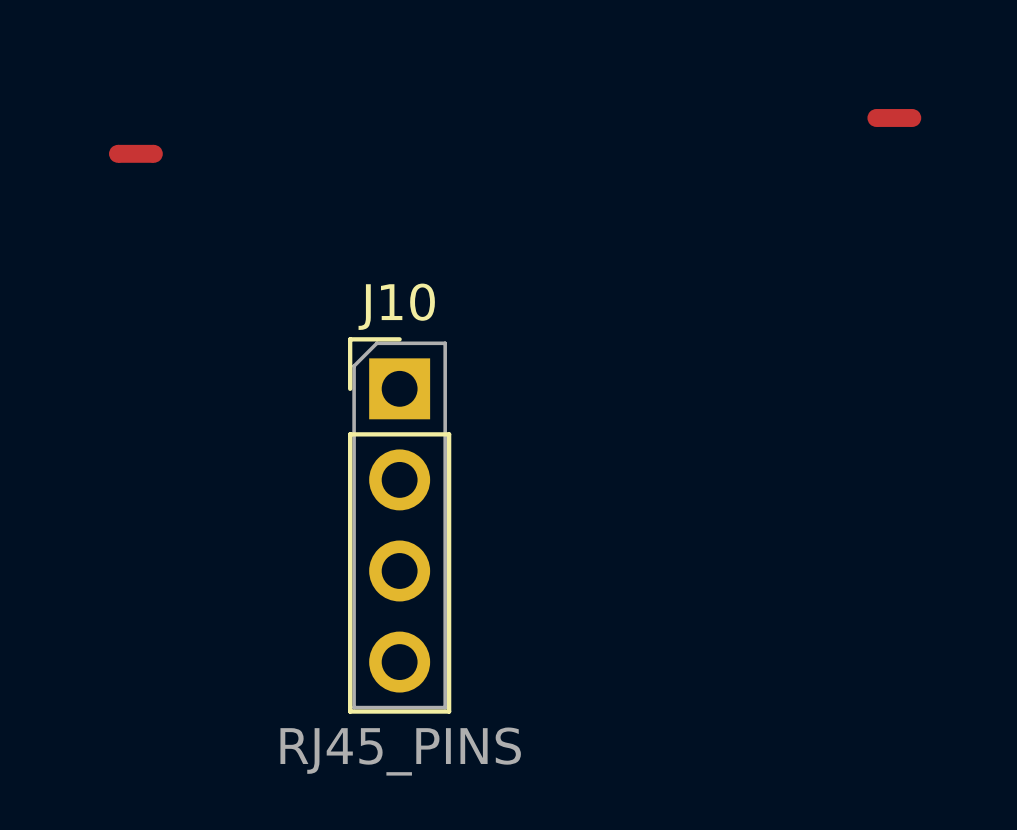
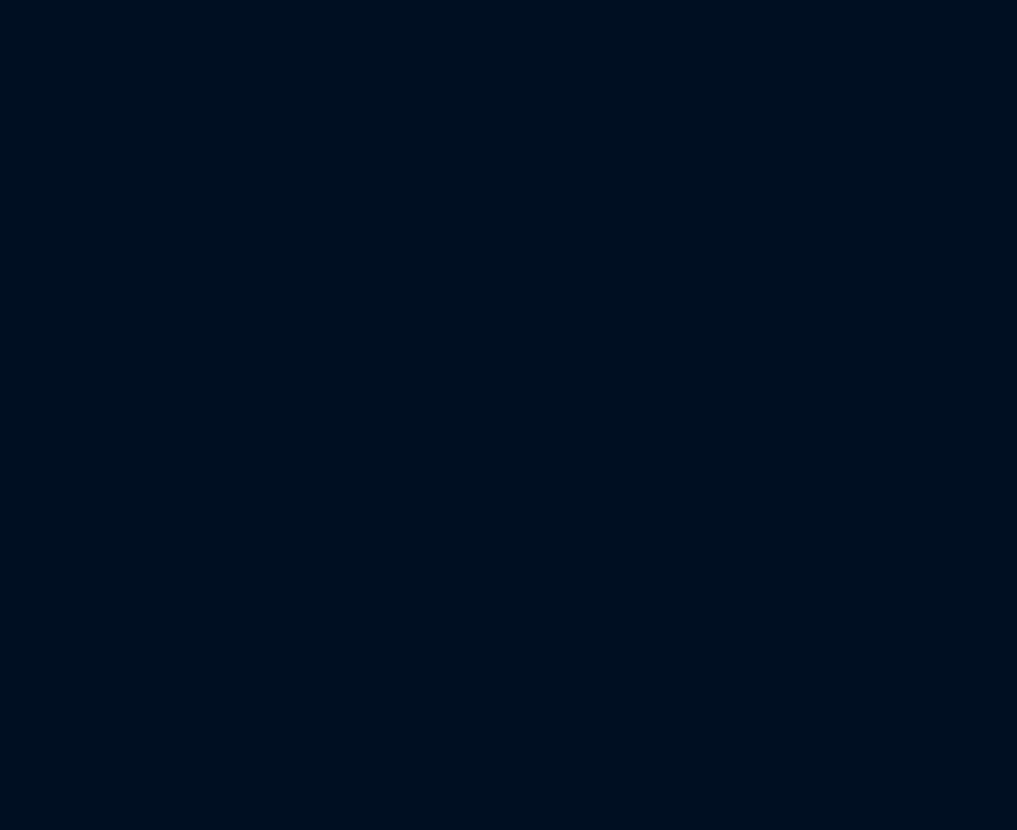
part: (894, 117) -> none
part: (135, 153) -> none
J10: RJ45_PINS (399, 525) -> none

